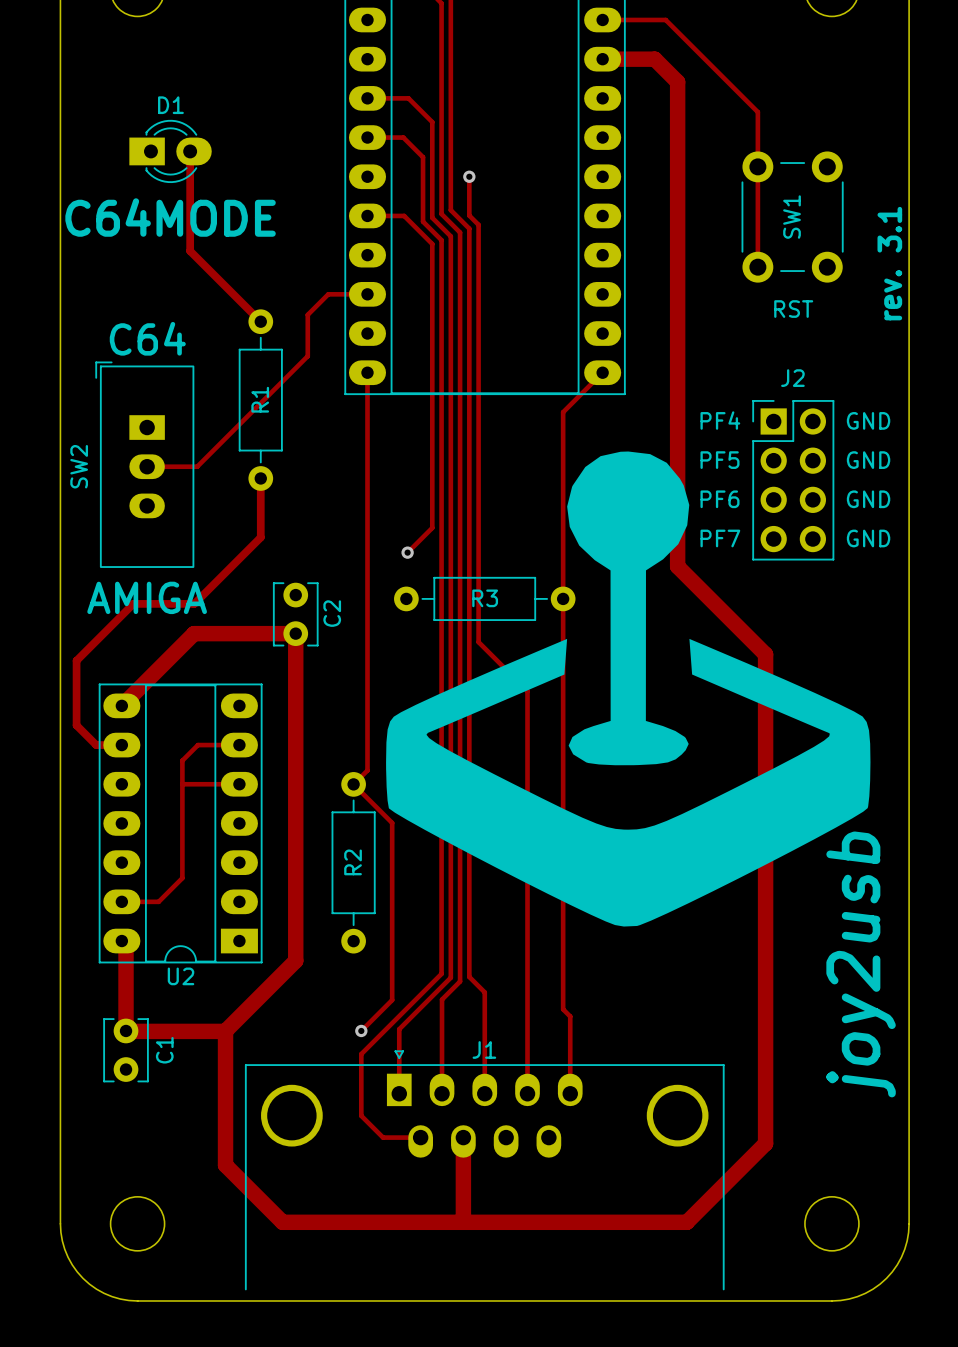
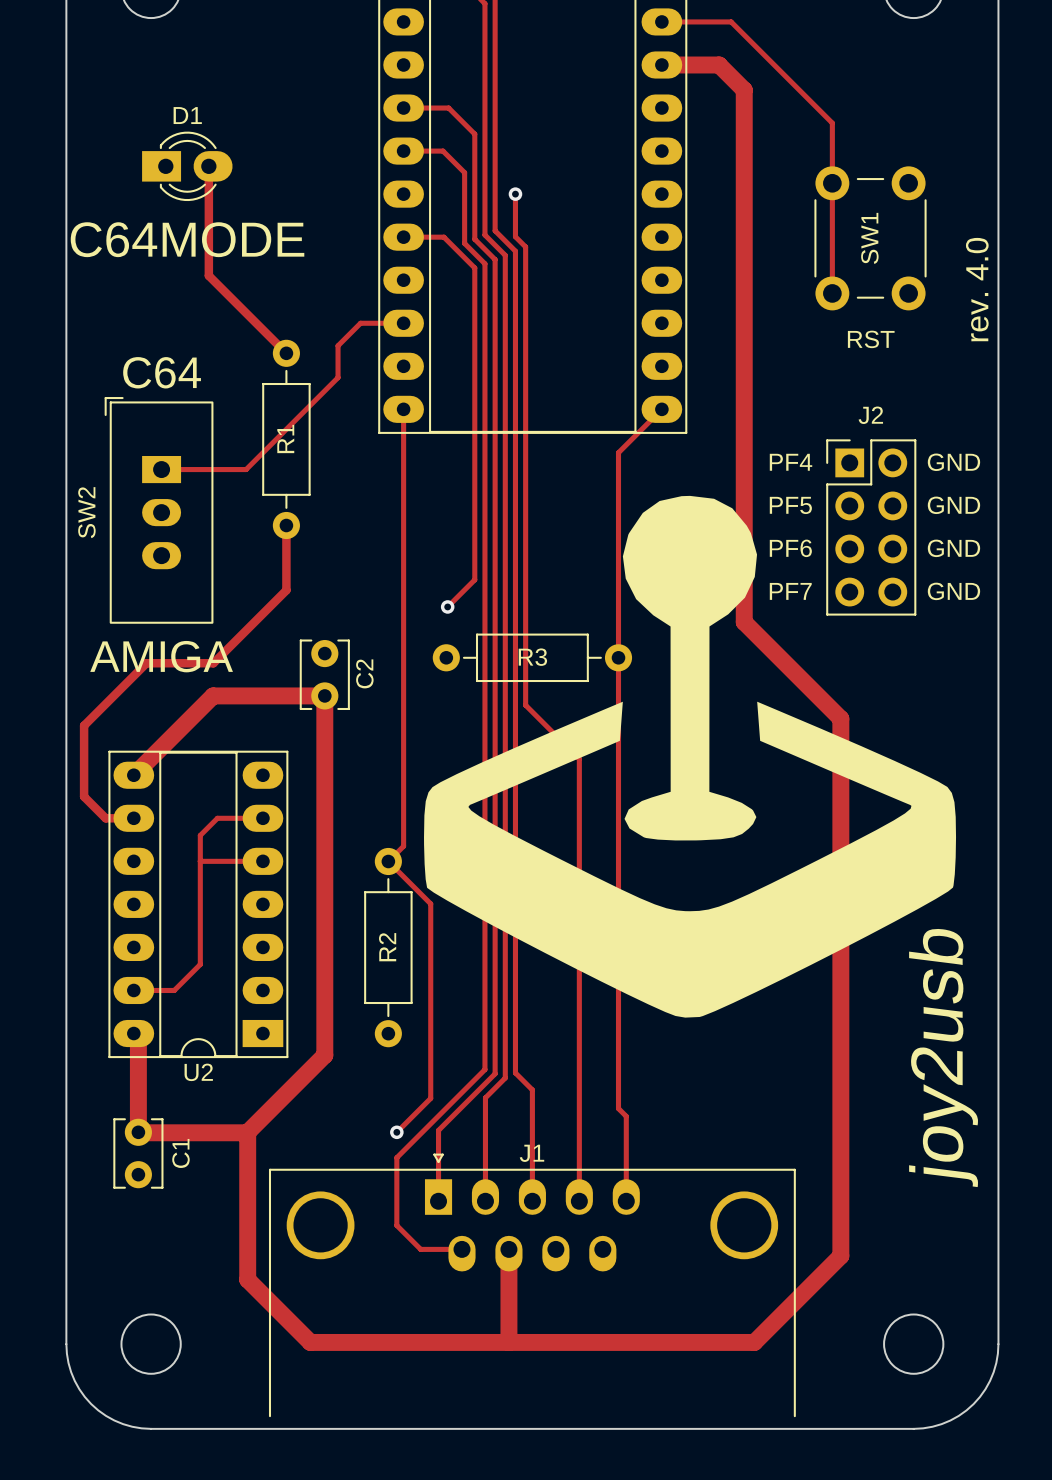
text: rev. 3.1 (889, 263) -> rev. 4.0 (977, 289)
track: (307, 343) (307, 356) (197, 466) (147, 466) -> (338, 377) (246, 469) (161, 469)

